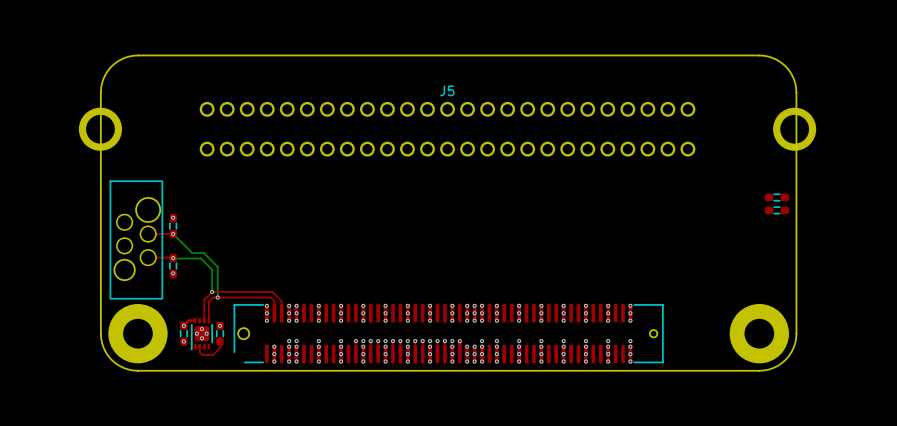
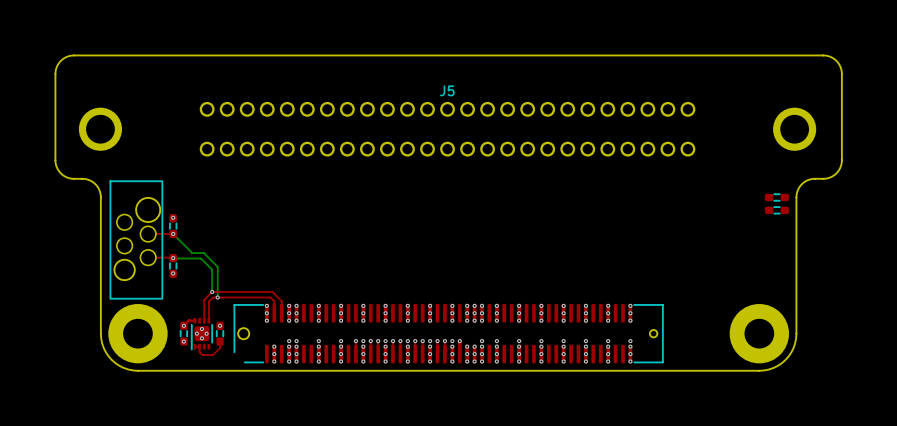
board edge: (137, 55) (128, 56) (115, 63) (105, 74) (102, 82) (100, 197) -> (137, 55) (69, 55) (60, 60) (55, 69) (56, 166) (65, 177) (92, 181) (98, 187) (100, 197)
board edge: (759, 55) (773, 58) (781, 63) (788, 69) (795, 82) (796, 197) -> (759, 55) (827, 55) (836, 60) (841, 69) (840, 166) (831, 176) (805, 181) (798, 189) (796, 197)

